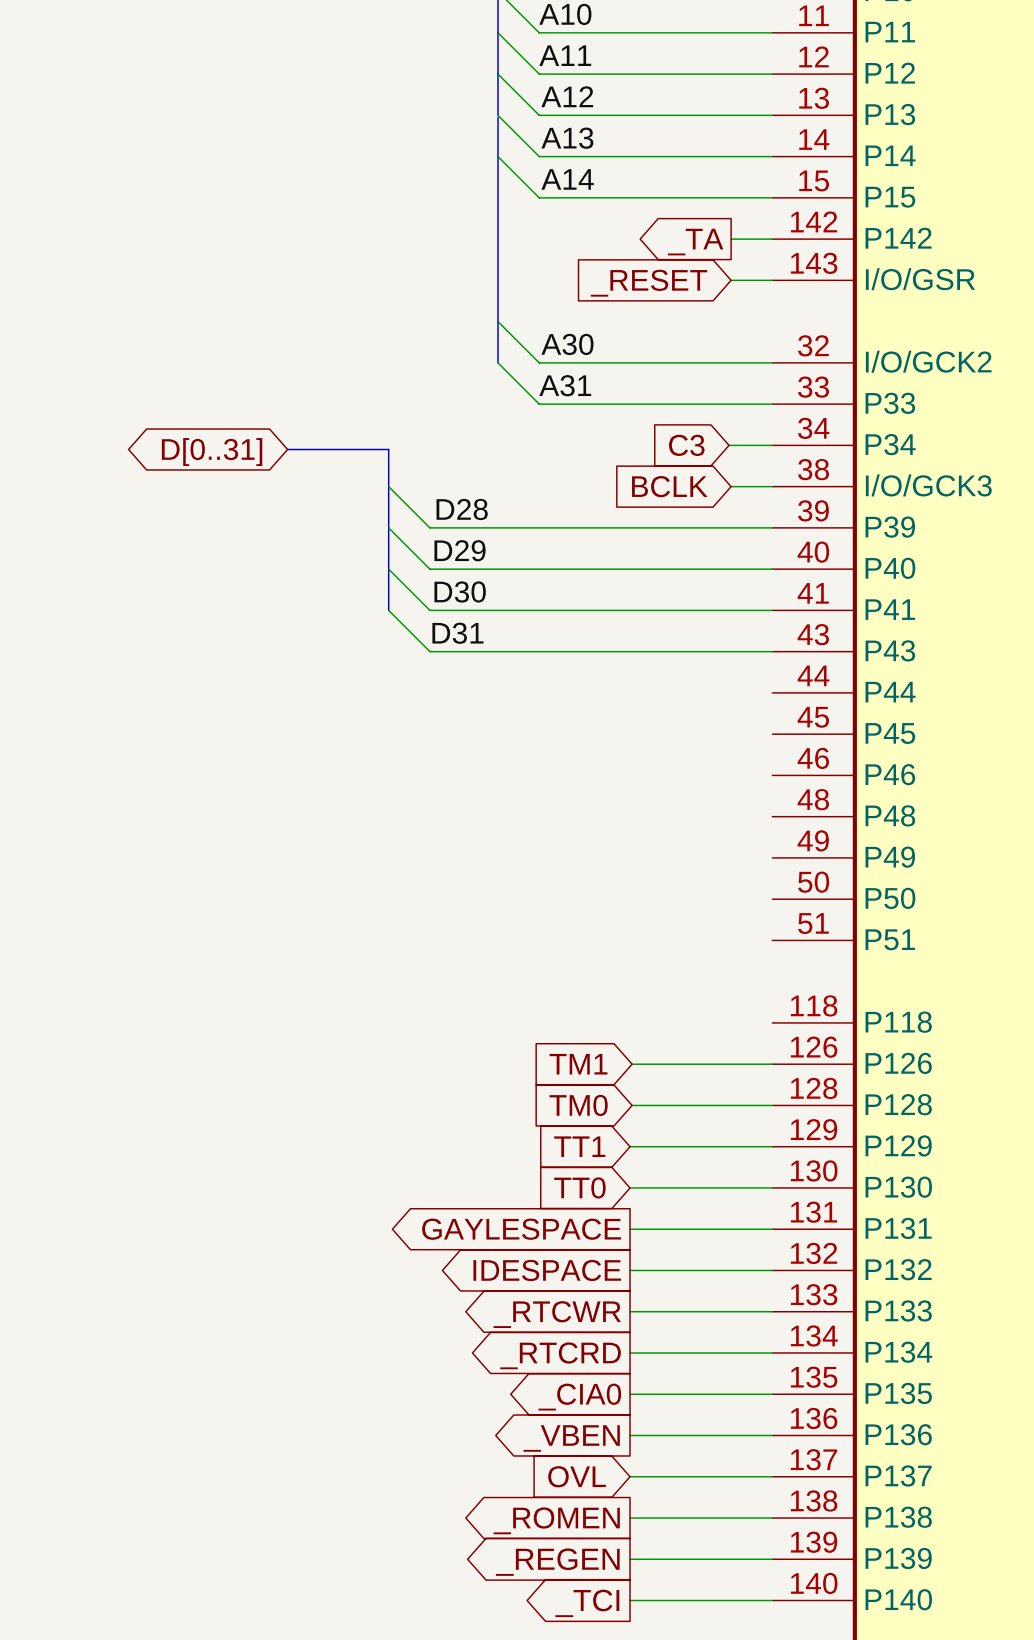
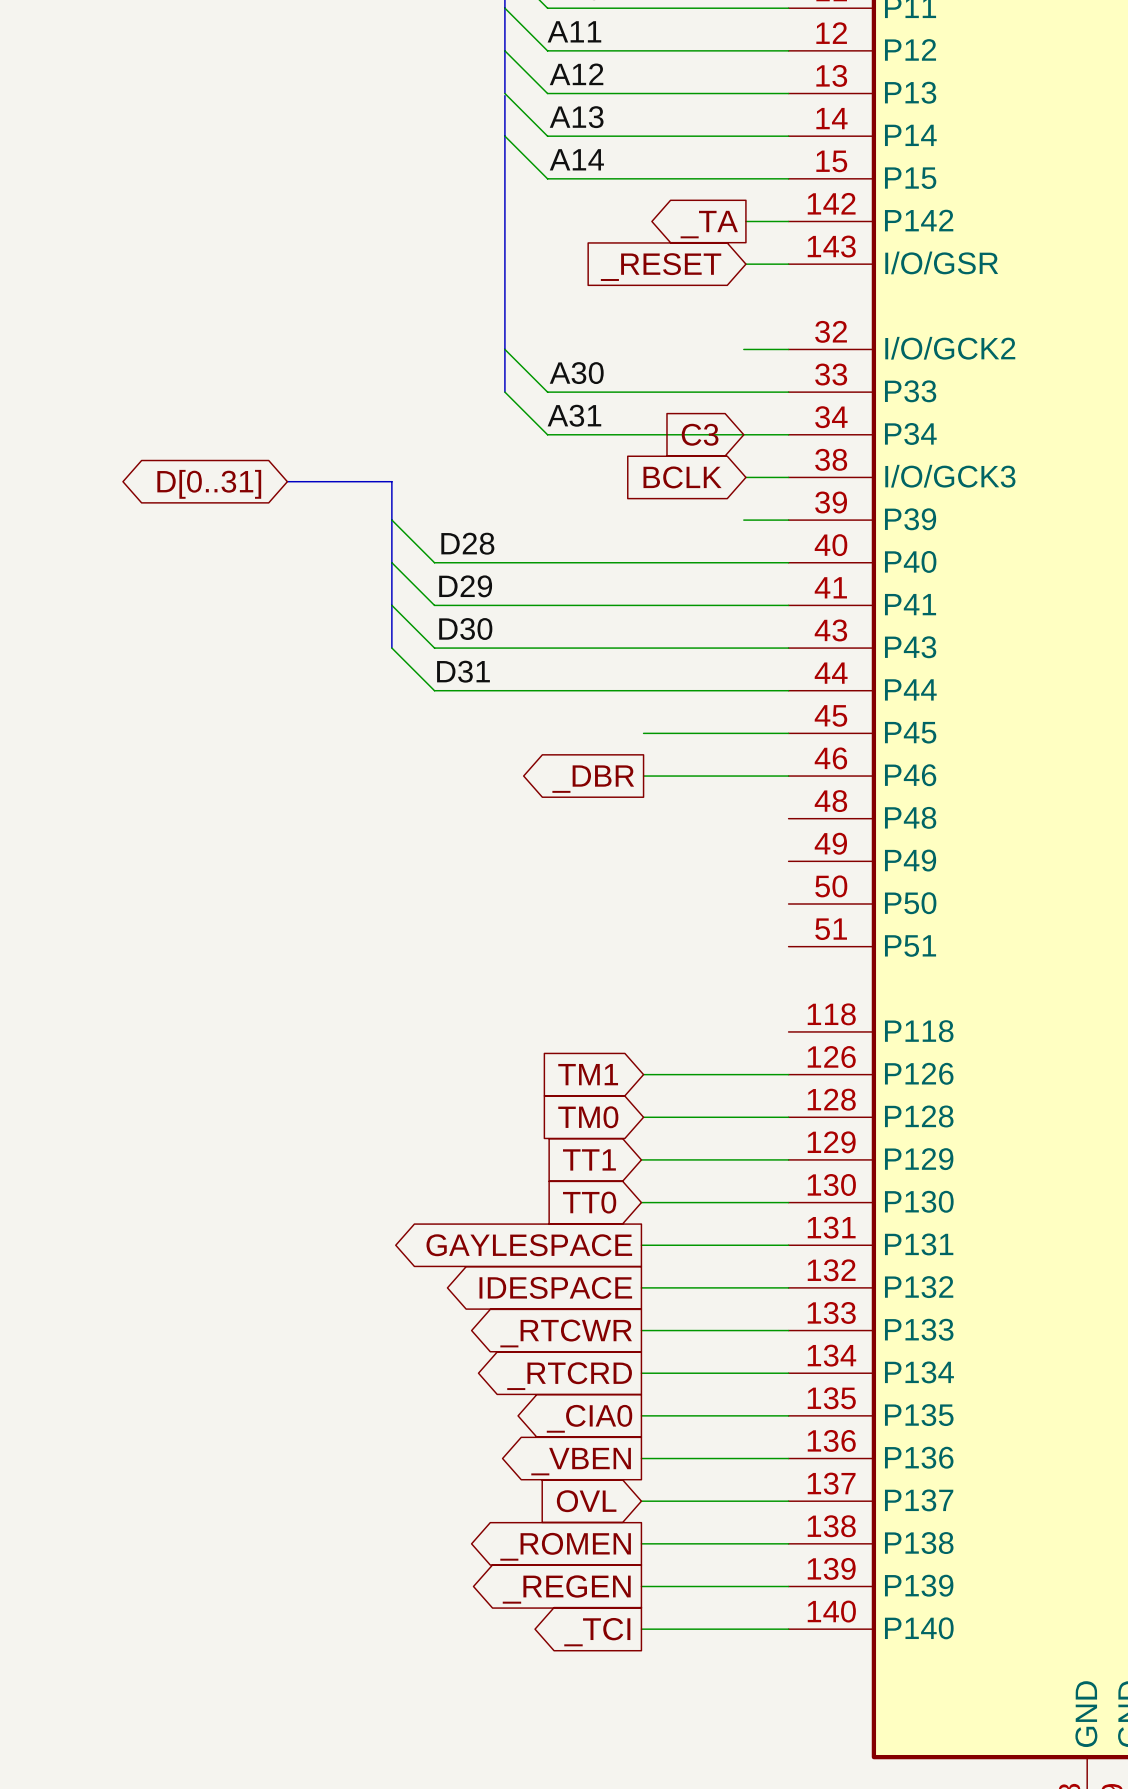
wire: (498, 321) (539, 362) (729, 362) -> (504, 392) (547, 434) (743, 434)
label position: A30 (567, 344) -> A30 (576, 373)
bus: none -> (504, 349) (504, 392)
label position: A31 (565, 385) -> A31 (574, 415)
bus: (287, 449) (388, 449) (388, 490) -> (287, 481) (391, 481)
global label position: D[0..31] (212, 452) -> D[0..31] (209, 484)
wire: (388, 486) (429, 527) (729, 527) -> none
label position: D28 (462, 509) -> D28 (467, 543)
label: D29 (460, 550) -> none
label: D30 (460, 591) -> D29 (465, 586)
bus: none -> (391, 605) (391, 648)
label position: D31 (457, 633) -> D31 (463, 671)
label: none -> D30 (465, 629)
wire: none -> (391, 648) (434, 690) (788, 690)
wire: none -> (643, 733) (788, 733)
wire: none -> (643, 776) (788, 776)
global label: none -> _DBR (593, 779)

